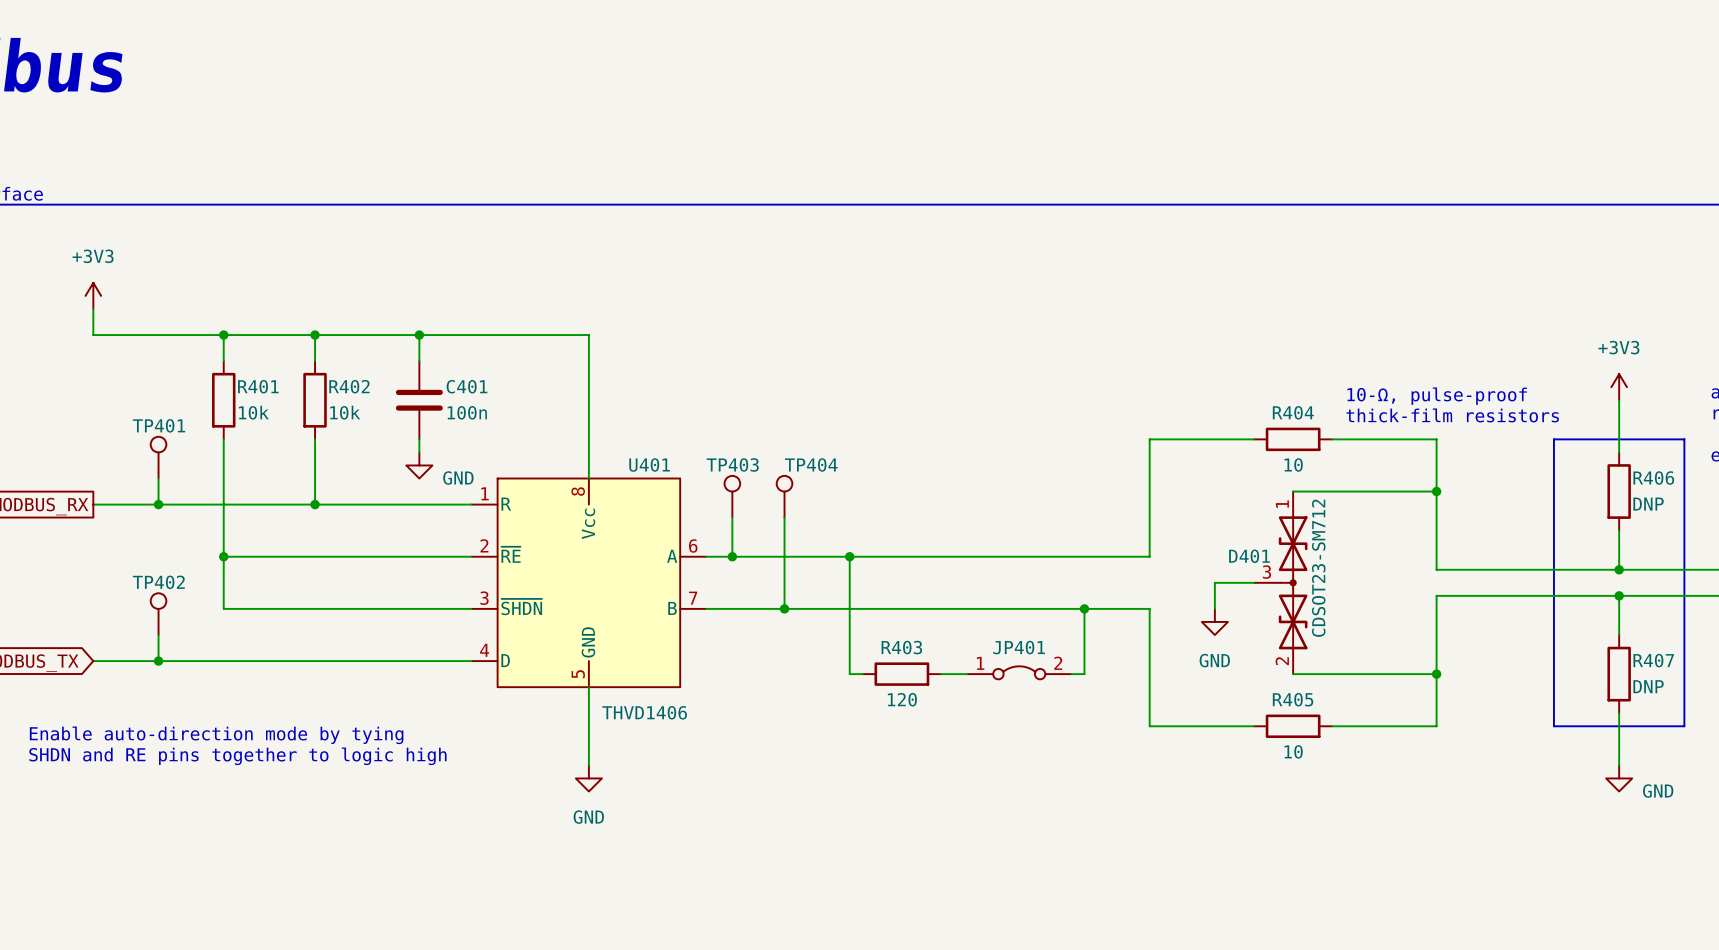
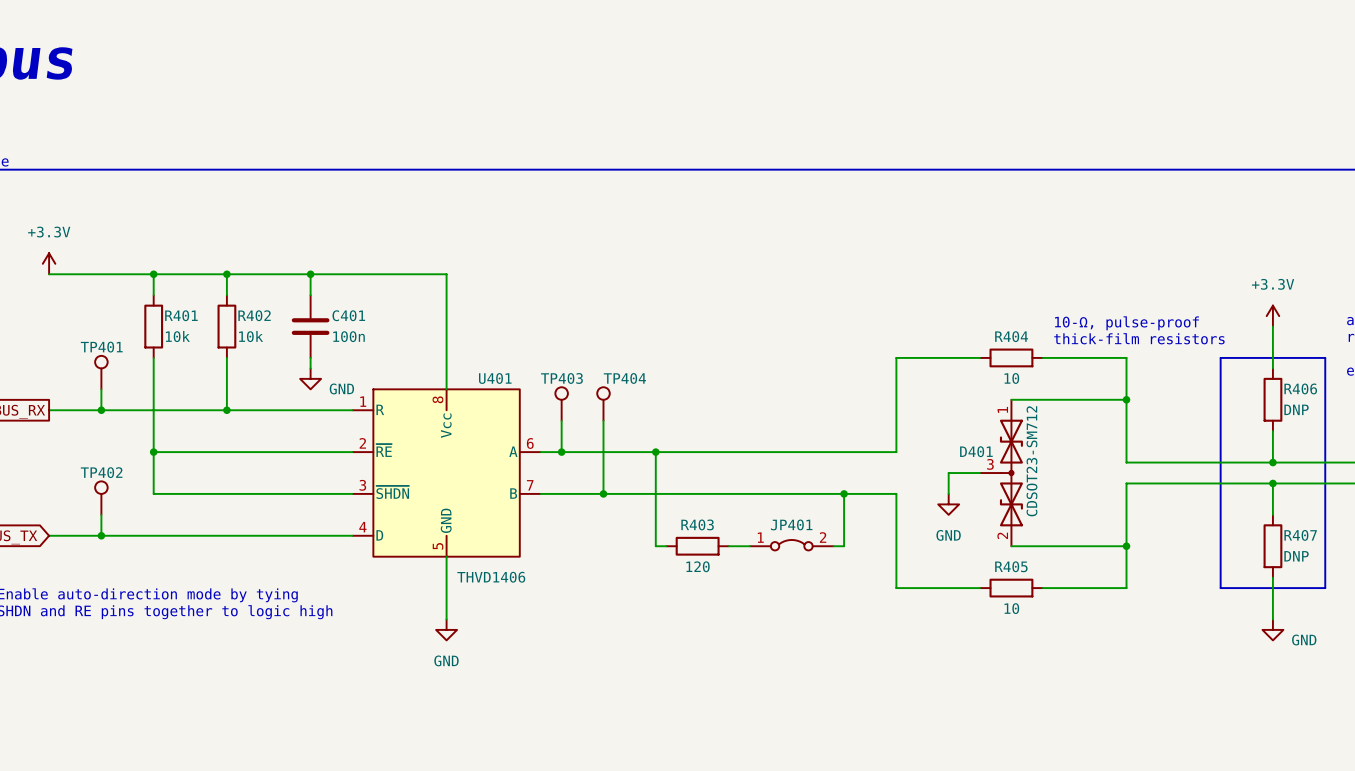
power symbol: +3V3 (93, 295) -> none
power symbol: none -> +3.3V (49, 263)
power symbol: +3V3 (1619, 387) -> +3.3V (1272, 316)

